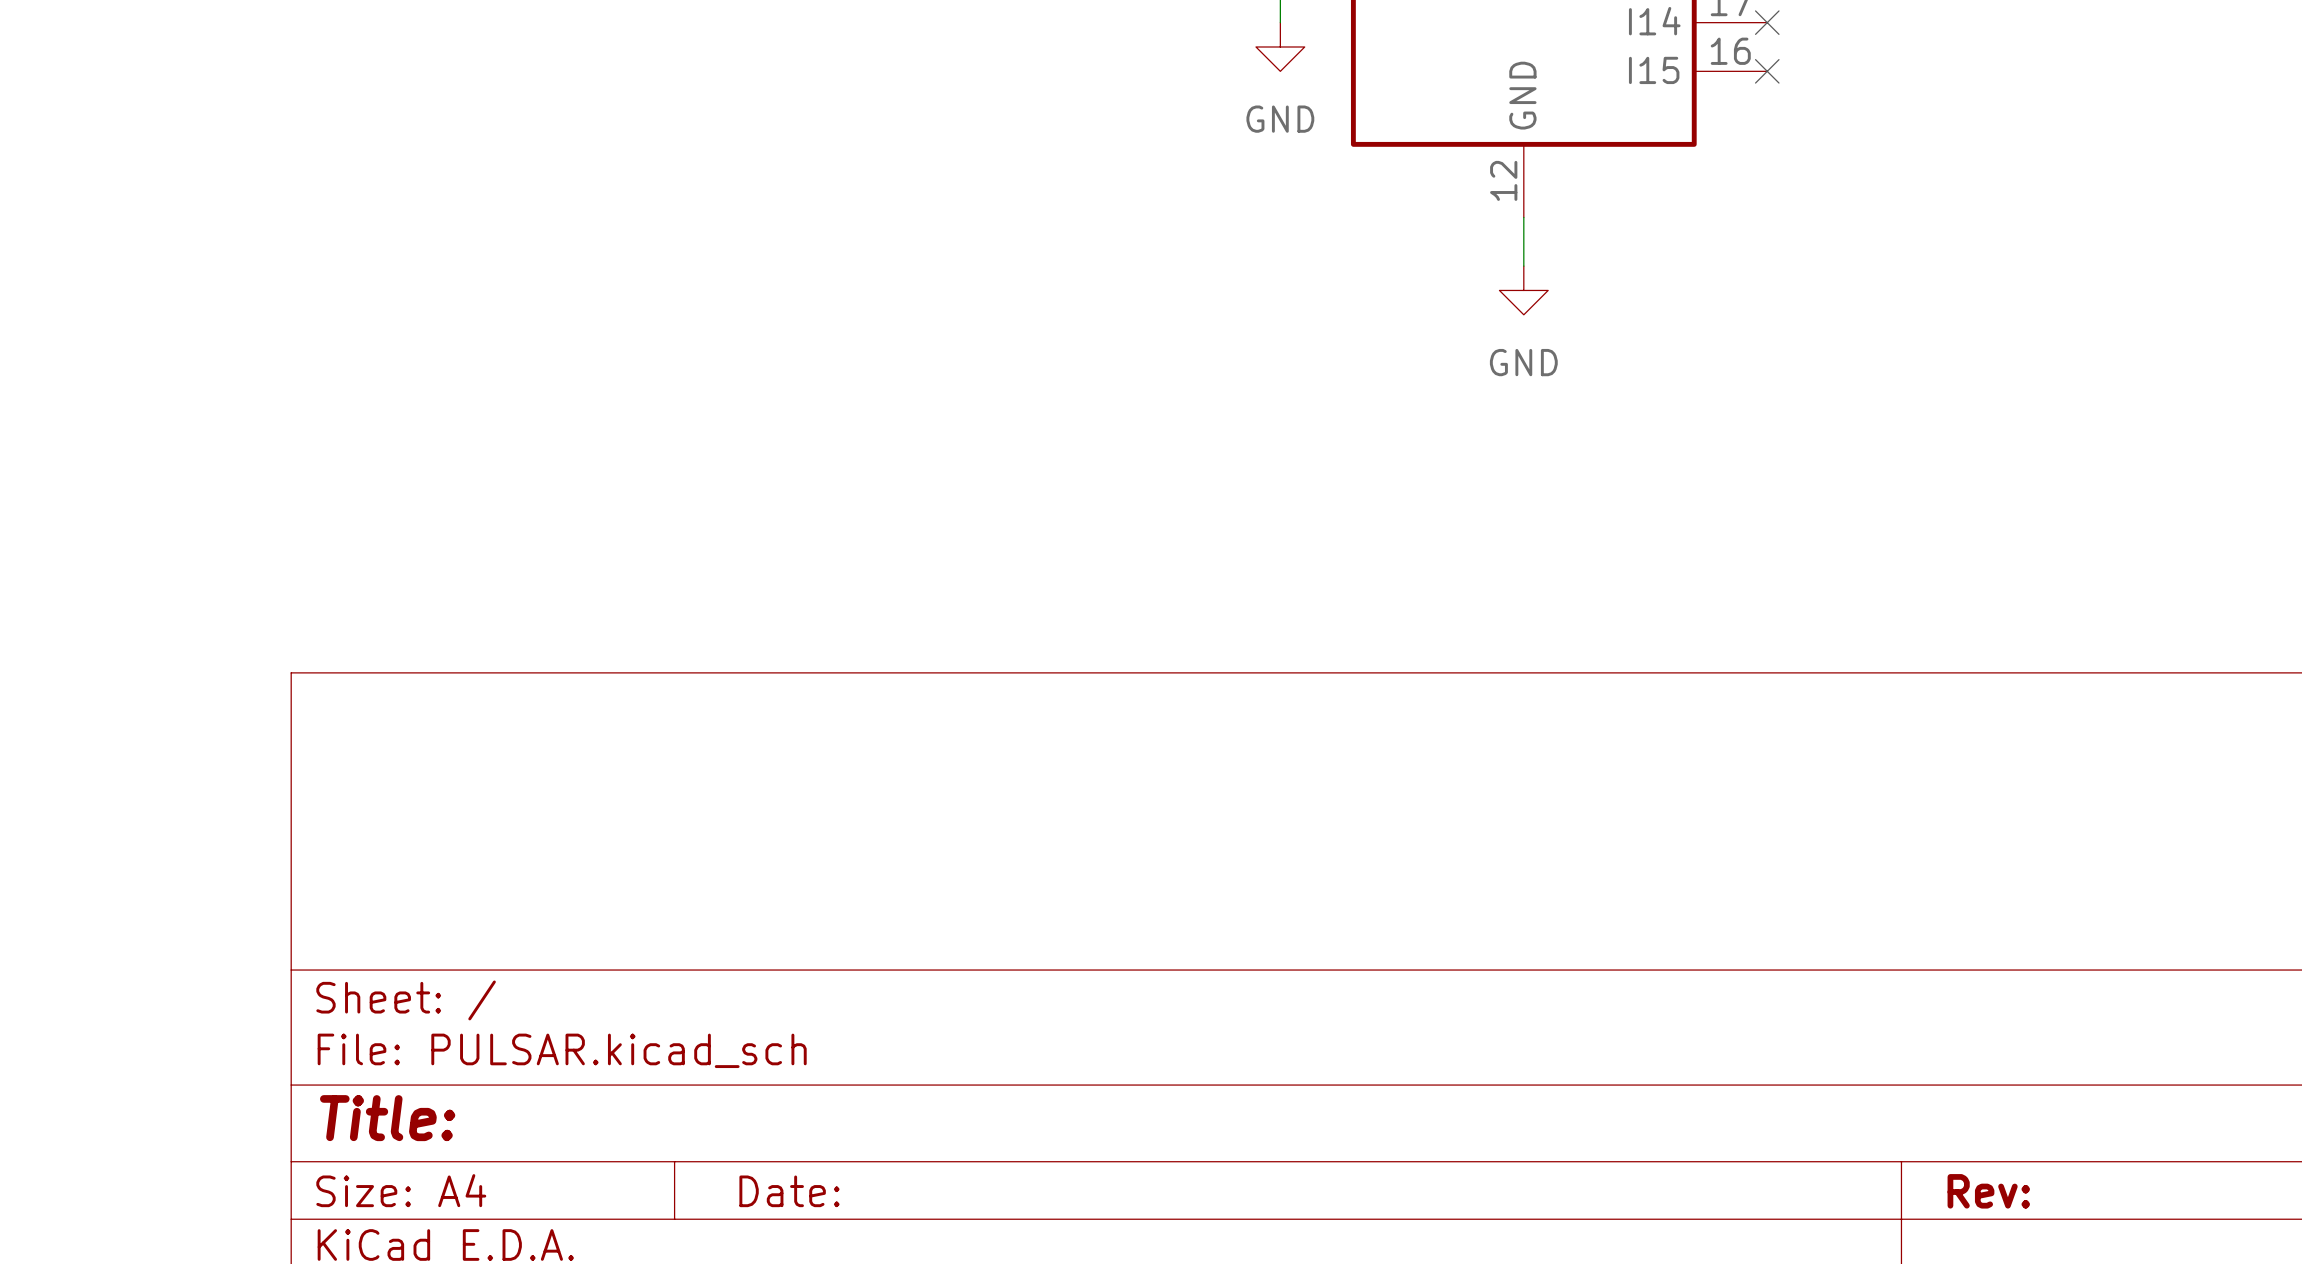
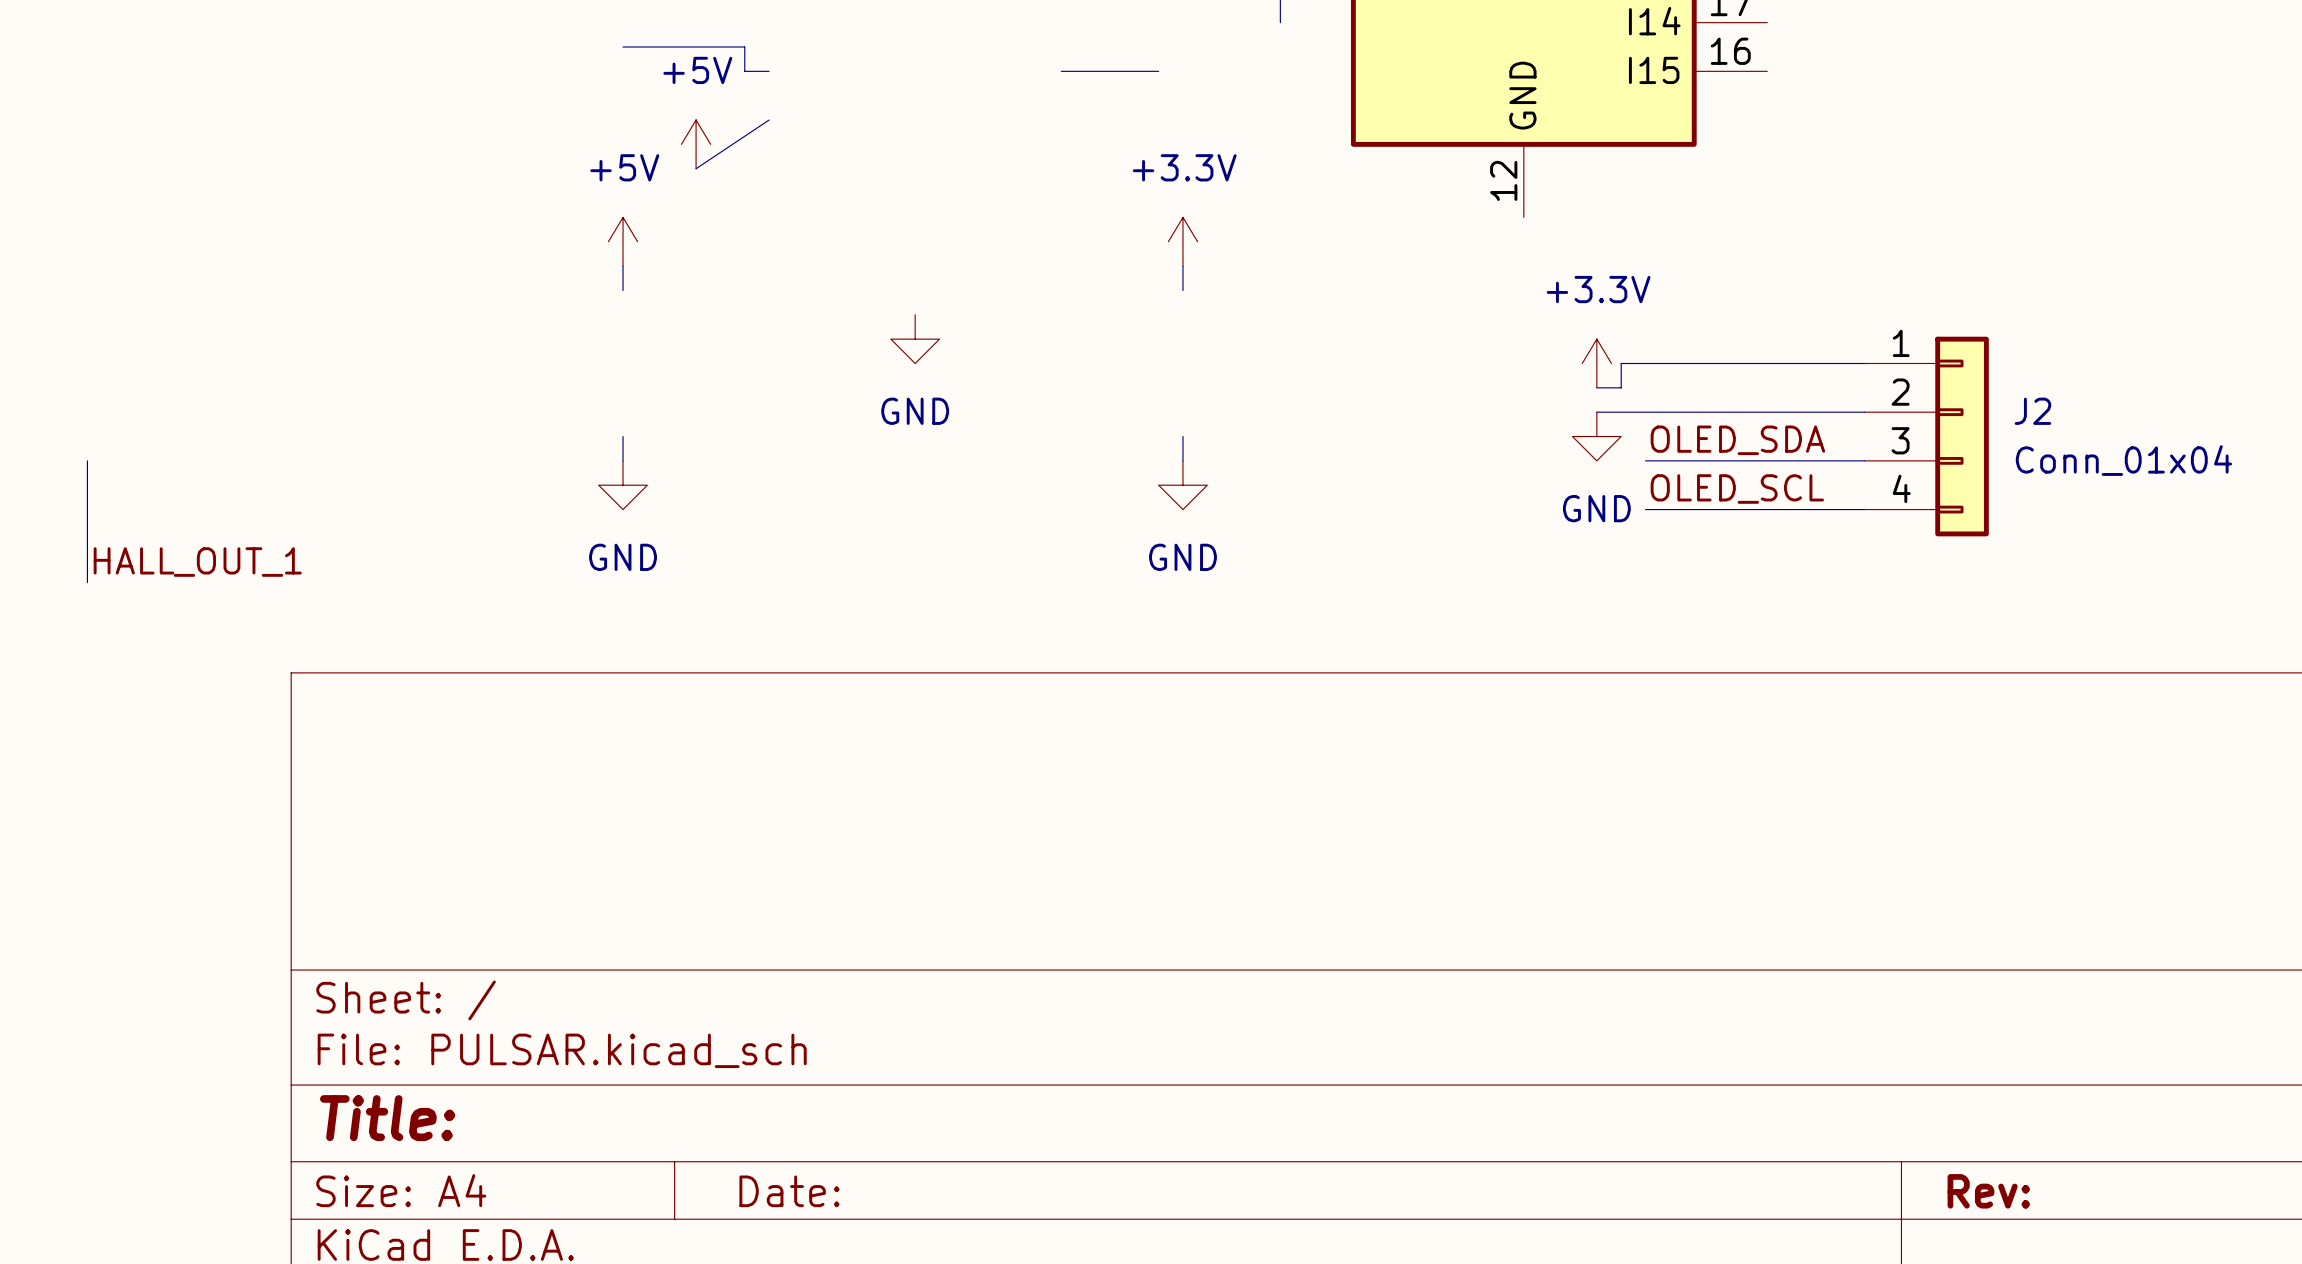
no-connect mark: (1767, 22) -> none
wire: none -> (623, 46) (744, 46) (744, 71) (769, 71)
power symbol: GND (1280, 46) -> none
wire: none -> (1061, 71) (1158, 71)
no-connect mark: (1767, 71) -> none
wire: none -> (769, 120) (696, 168)
power symbol: none -> +5V (696, 144)
wire: (1523, 217) (1523, 266) -> none
power symbol: none -> +5V (623, 241)
power symbol: none -> +3.3V (1182, 241)
wire: none -> (623, 266) (623, 290)
wire: none -> (1182, 266) (1182, 290)
power symbol position: GND (1523, 290) -> GND (1596, 436)
power symbol: none -> GND (915, 339)
power symbol: none -> +3.3V (1596, 363)
wire: none -> (1864, 363) (1621, 363) (1621, 387) (1596, 387)
wire: none -> (1596, 412) (1864, 412)
wire: none -> (623, 436) (623, 460)
wire: none -> (1182, 436) (1182, 460)
J2: none -> Conn_01x04 (1926, 436)
label: none -> OLED_SDA (1737, 440)
wire: none -> (87, 460) (87, 582)
wire: none -> (1645, 460) (1864, 460)
power symbol: none -> GND (623, 485)
power symbol: none -> GND (1182, 485)
label: none -> OLED_SCL (1737, 489)
wire: none -> (1645, 509) (1864, 509)
label: none -> HALL_OUT_1 (197, 562)

